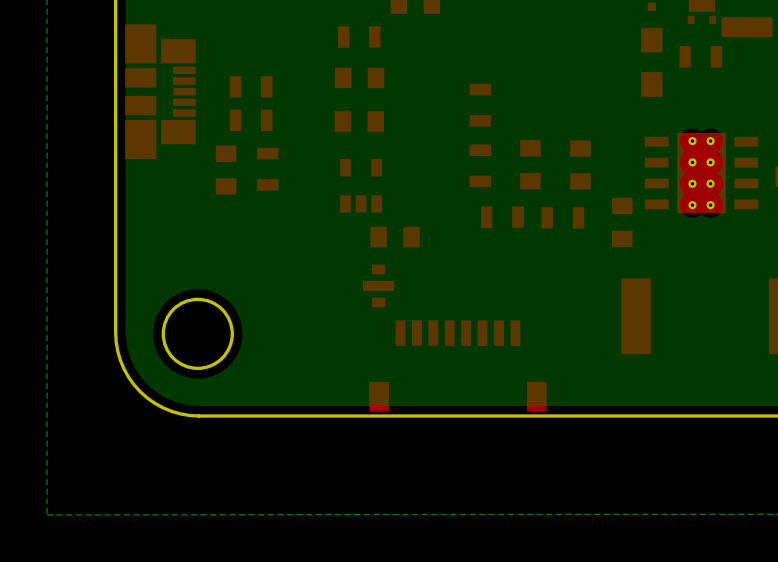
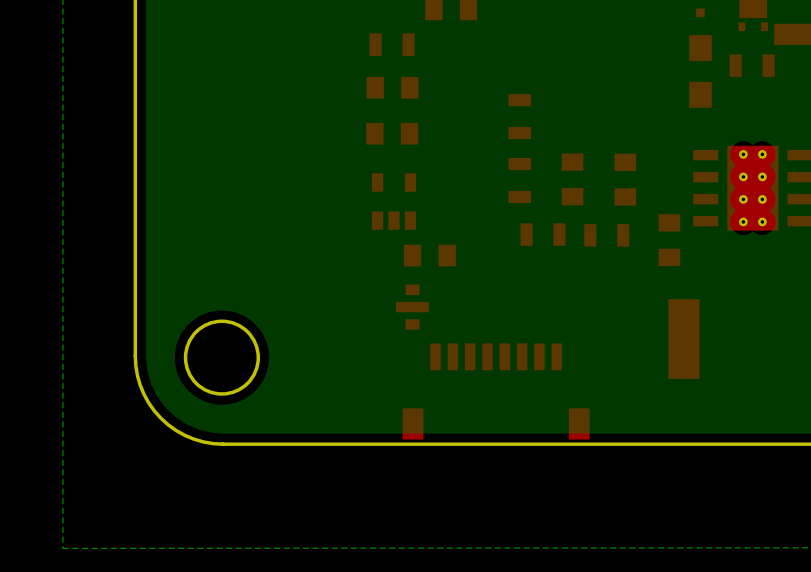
part: (251, 86) -> none
part: (160, 91) -> none
part: (251, 120) -> none
part: (267, 169) -> none
part: (226, 170) -> none

